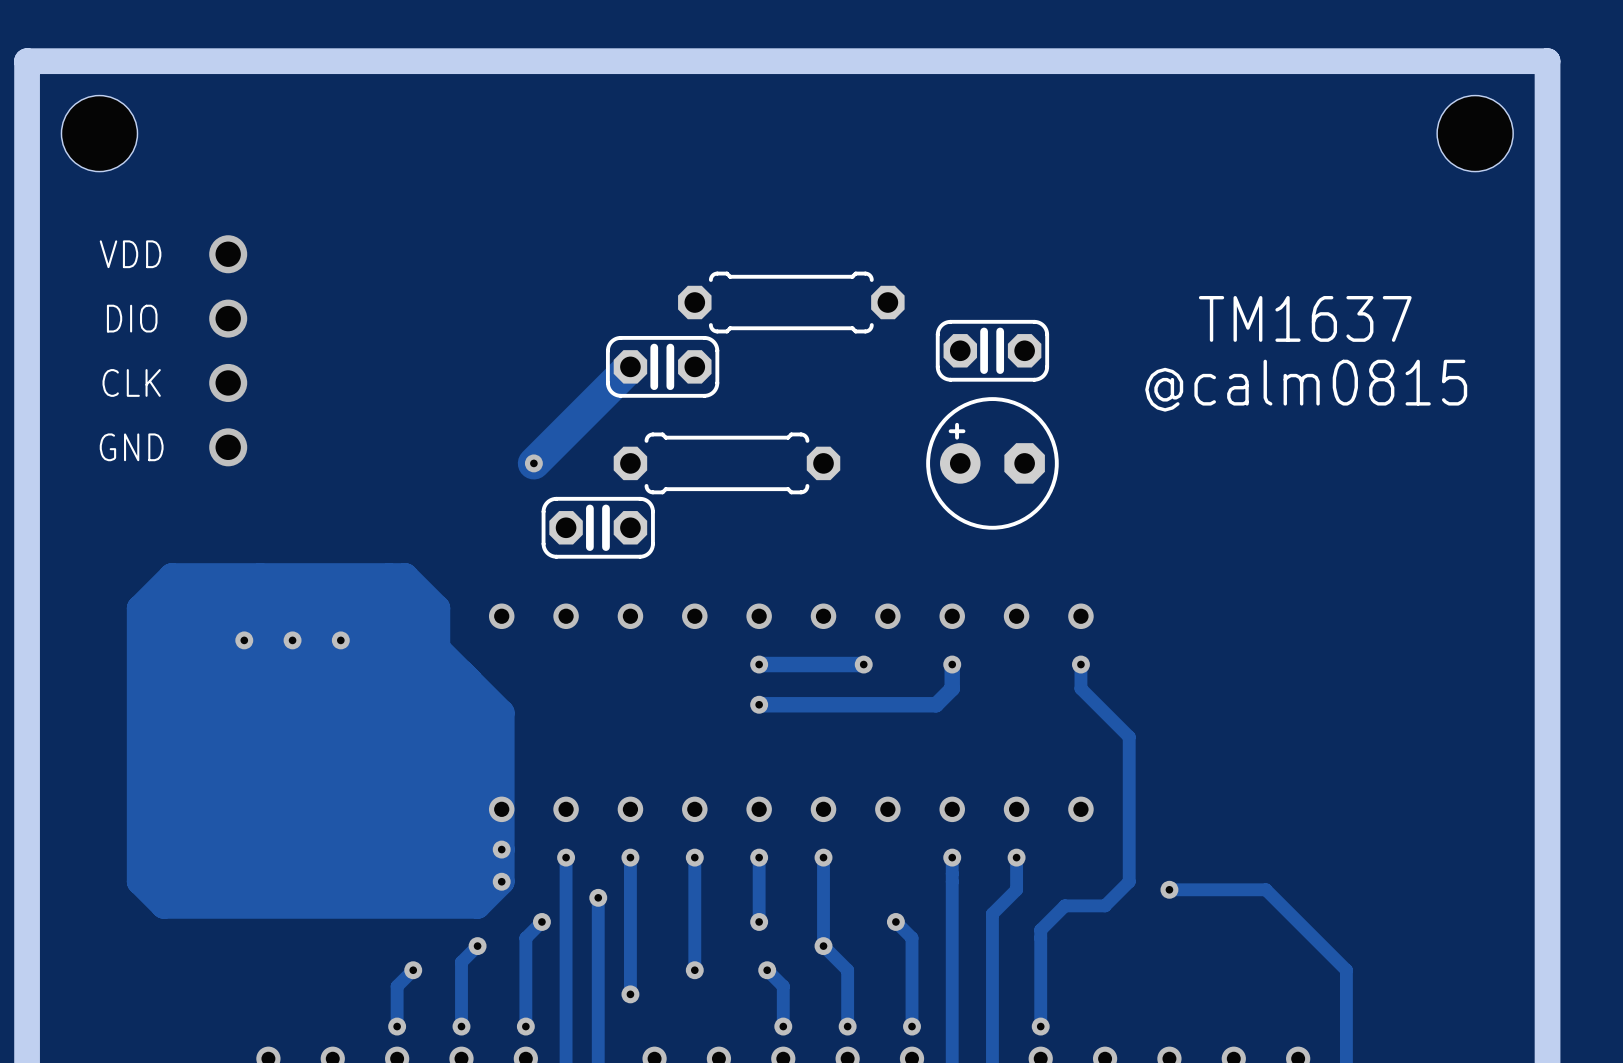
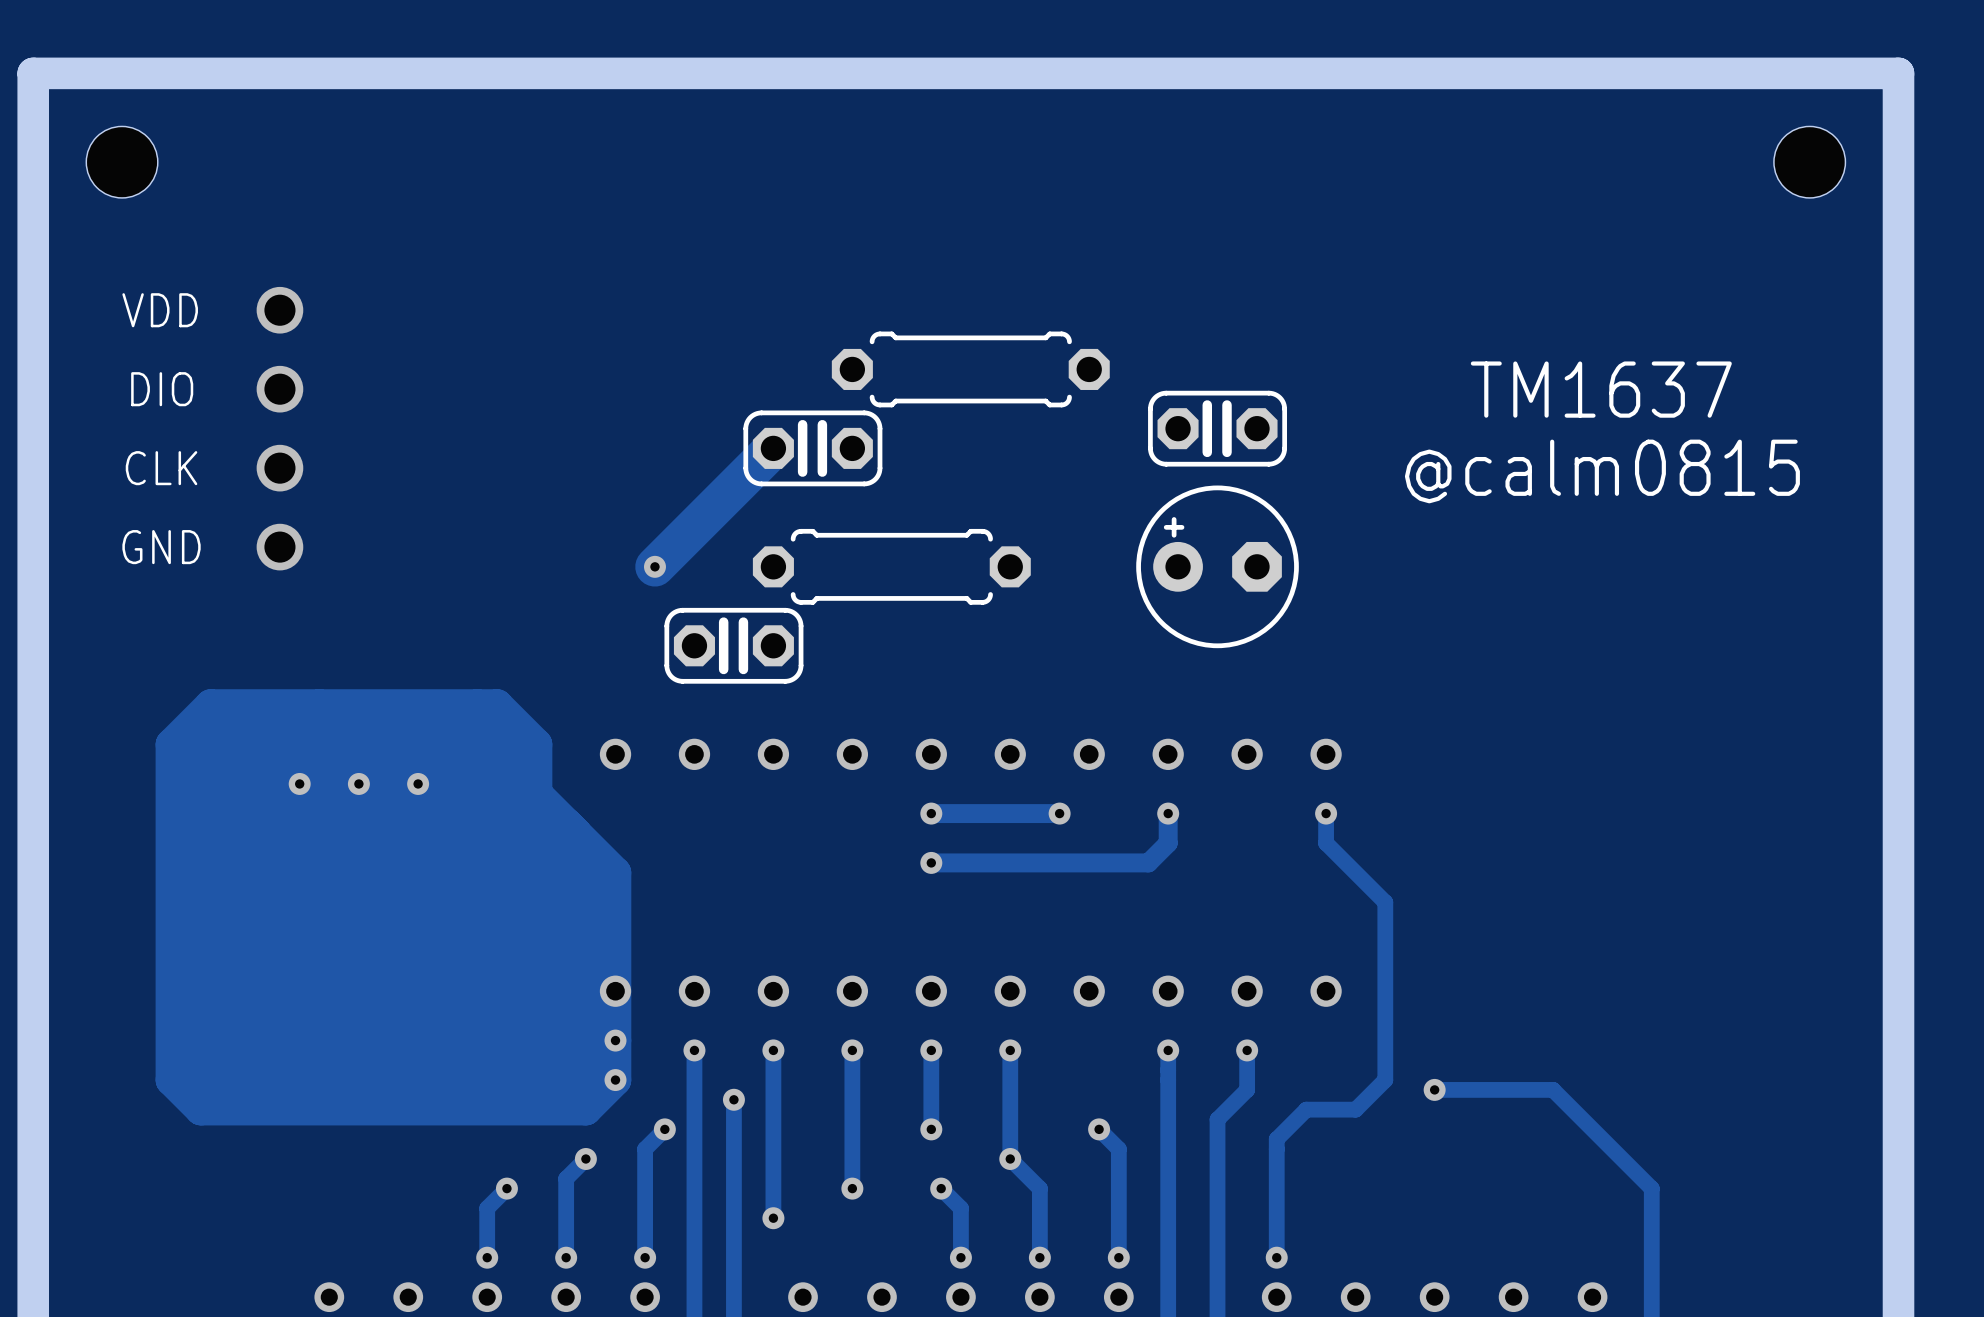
hole size: [61, 95, 138, 172] -> [86, 126, 158, 198]
hole size: [1437, 95, 1514, 172] -> [1773, 126, 1846, 198]

